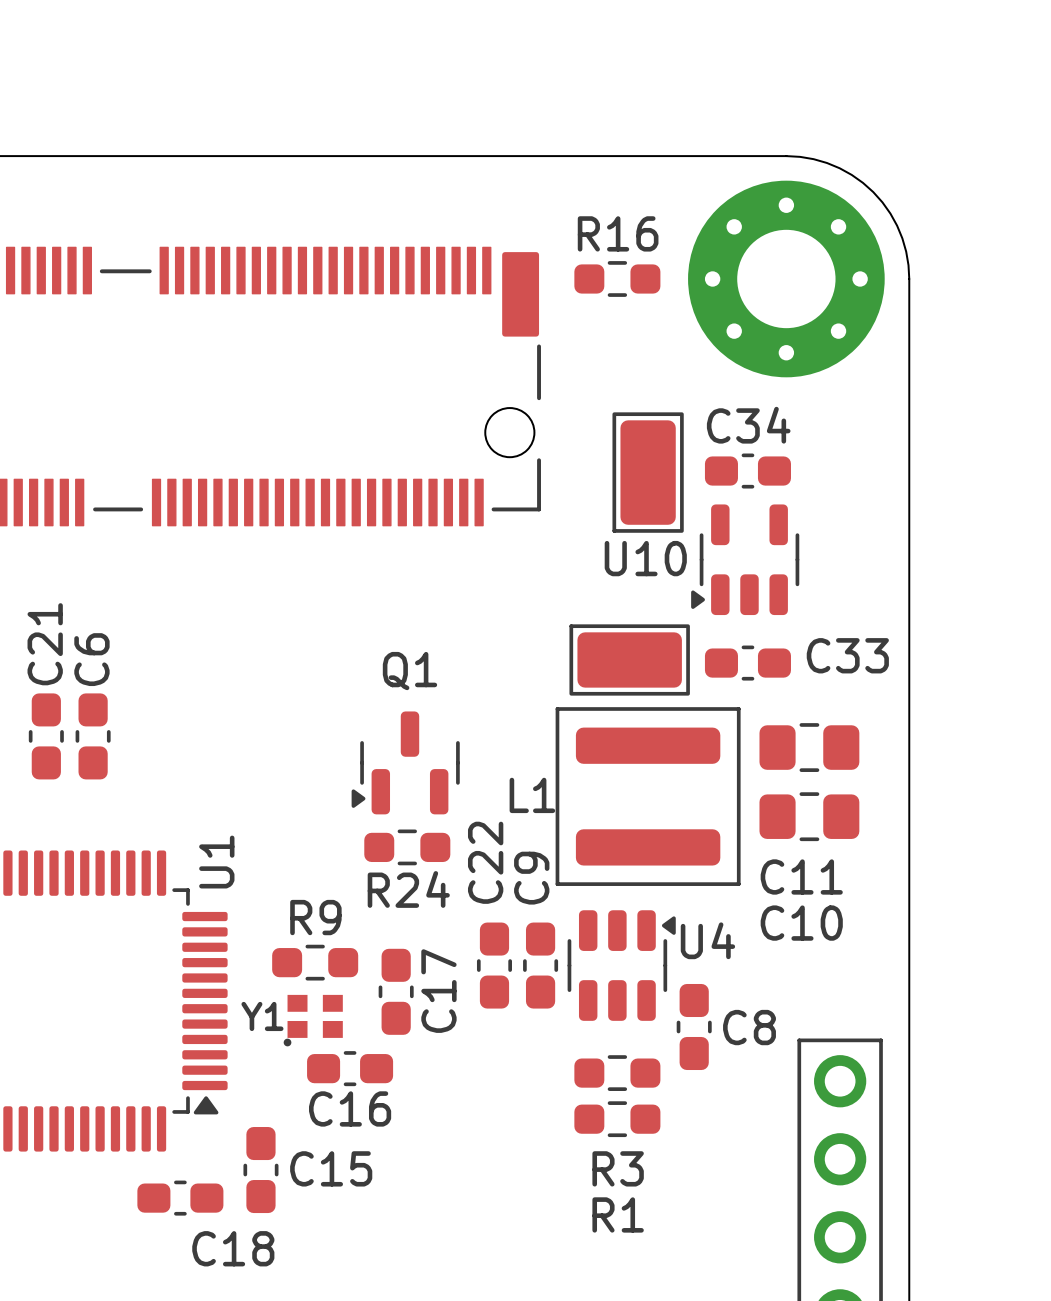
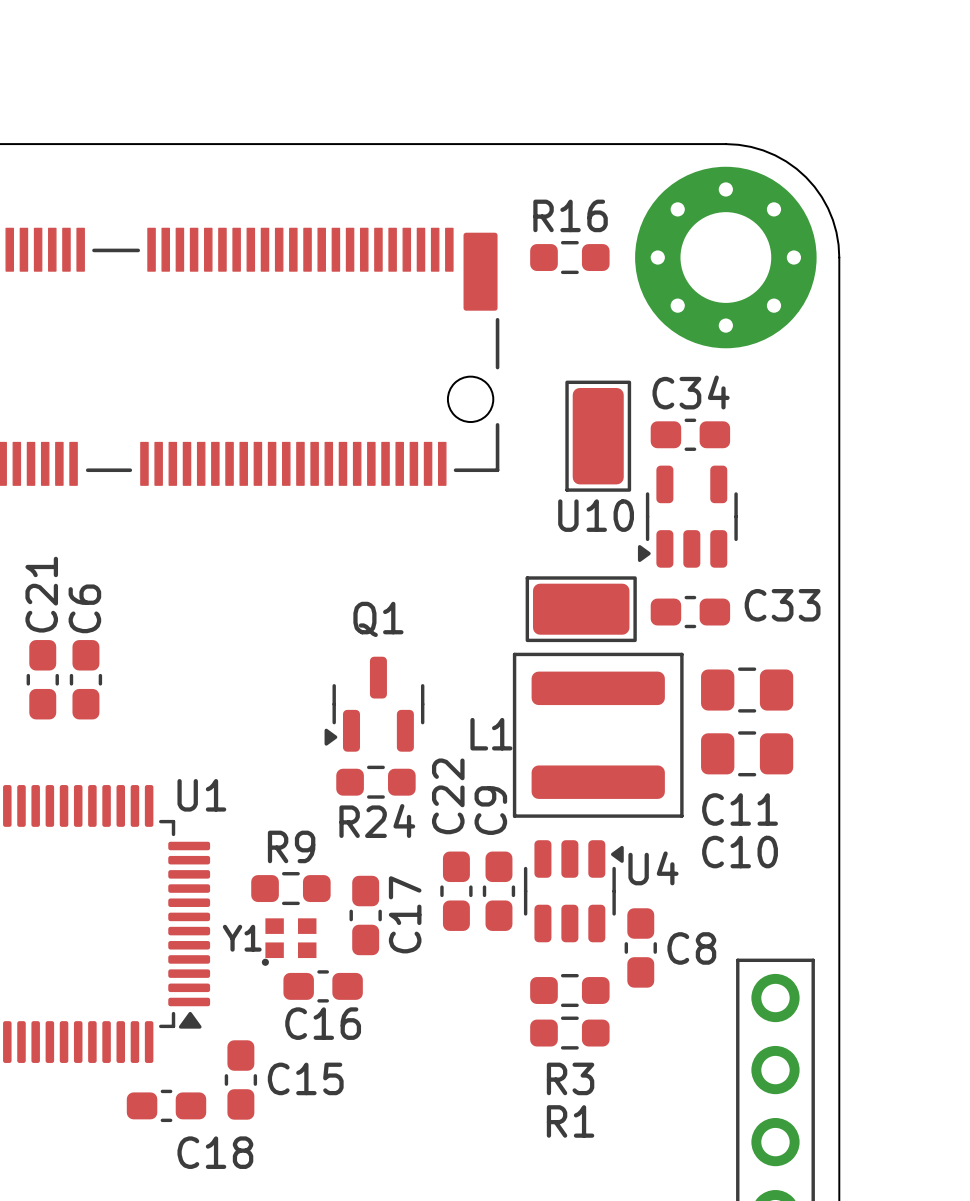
U1 name rotation: 0° (216, 862) -> 90° clockwise (201, 795)

